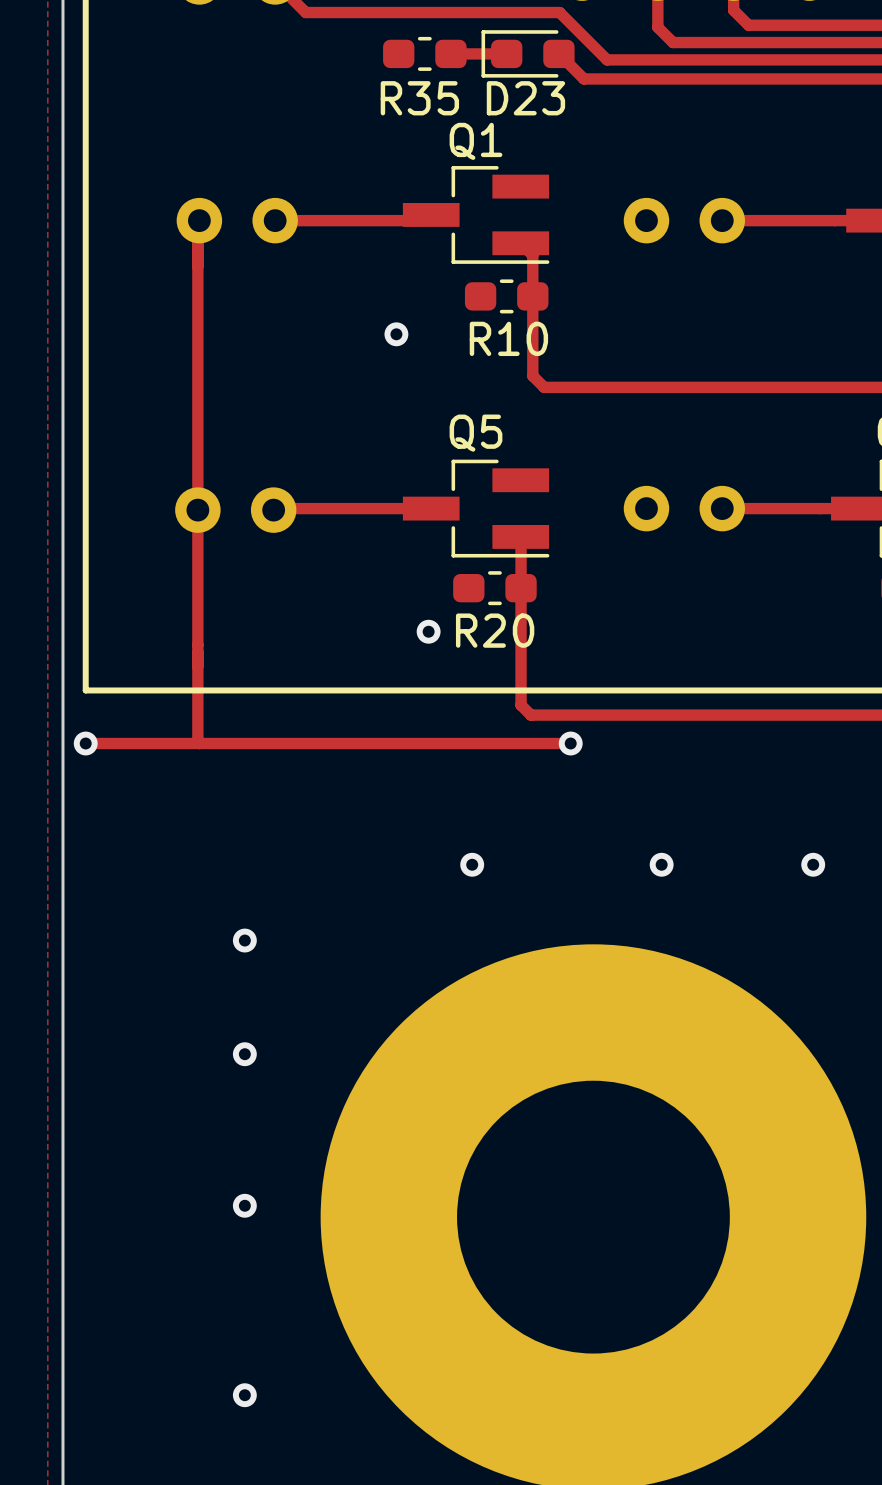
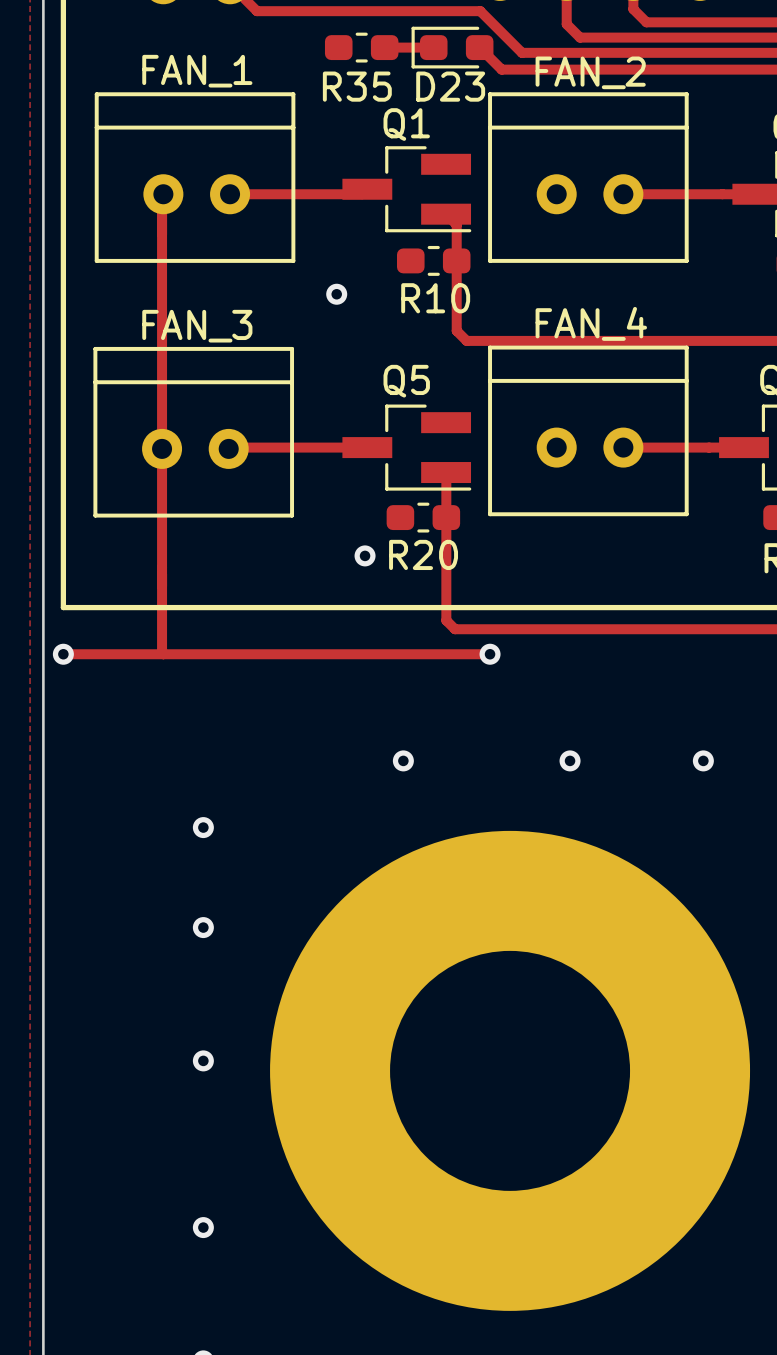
part side: bottom (237, 220) -> top (195, 177)
part side: bottom (684, 220) -> top (588, 177)
part side: bottom (684, 508) -> top (588, 430)
part side: bottom (235, 510) -> top (193, 432)

